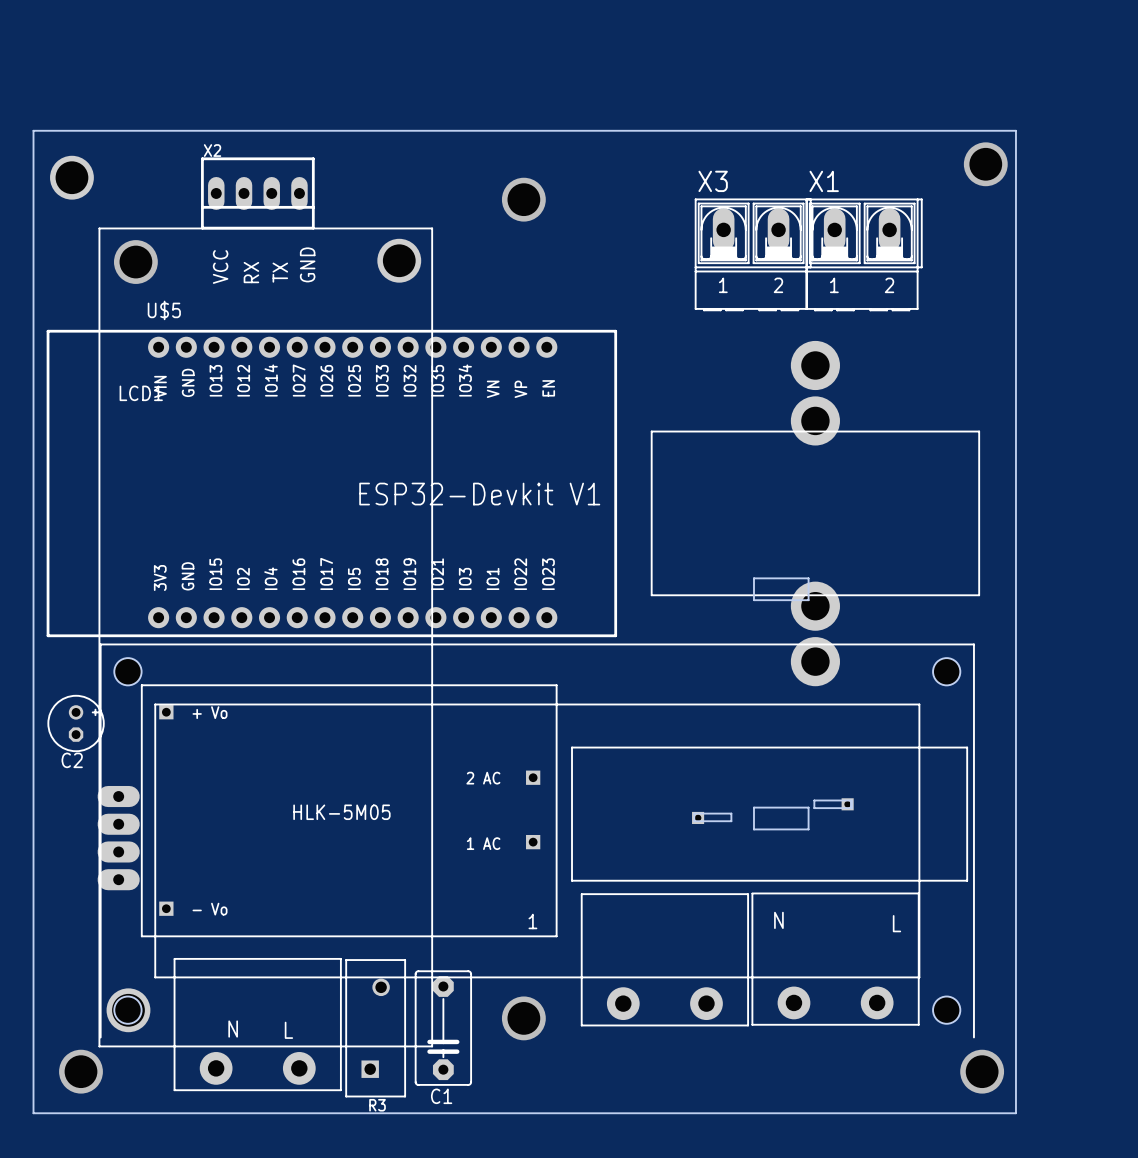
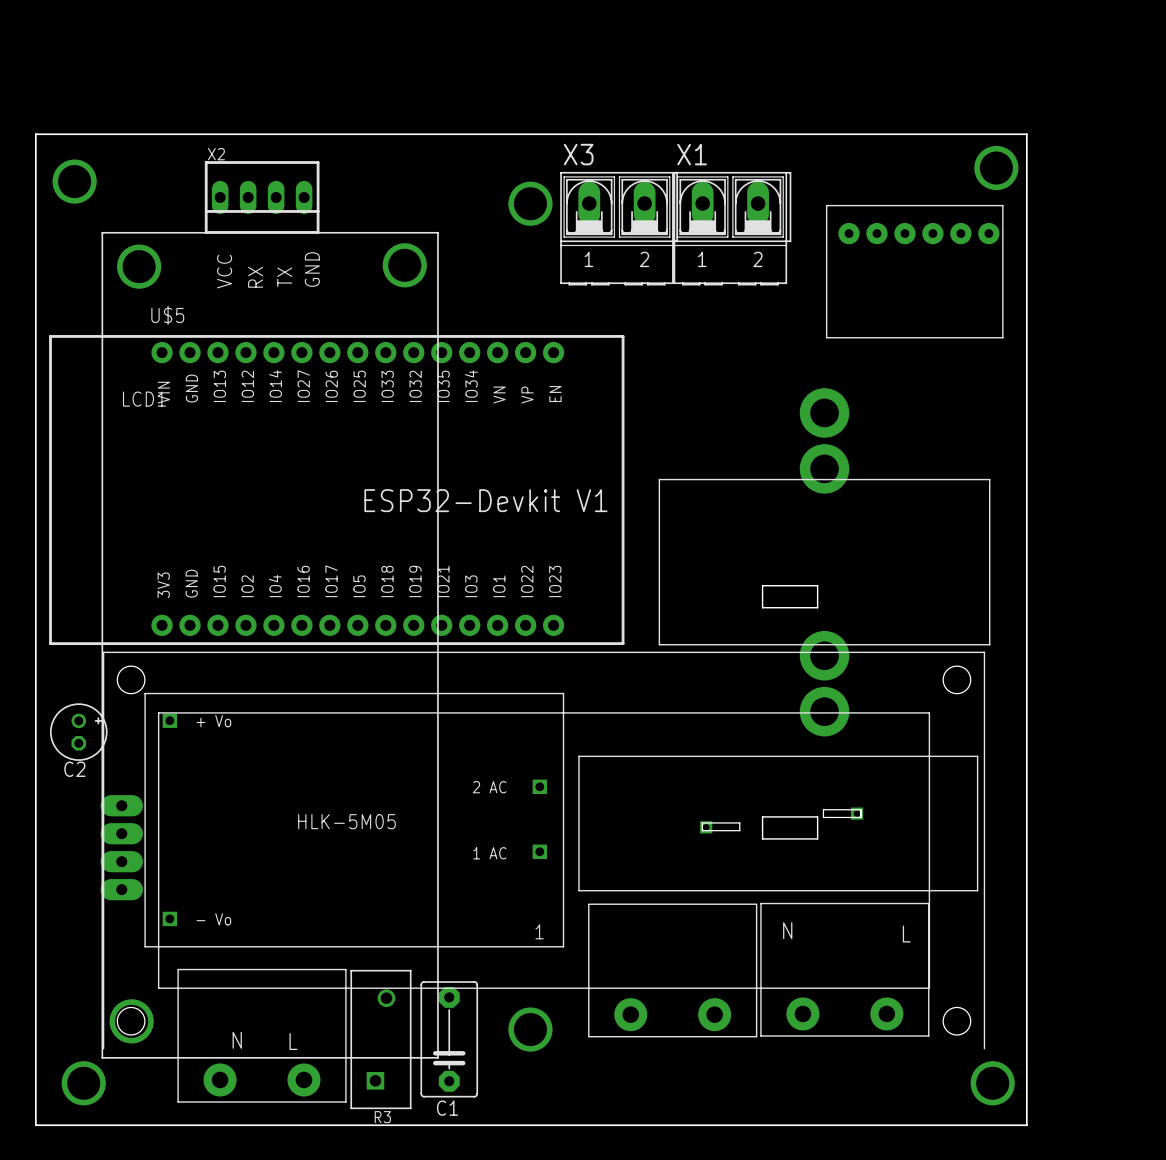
X3 position: (753, 254) -> (619, 228)
X1 position: (864, 254) -> (732, 228)
part: none -> (914, 271)
part position: (815, 513) -> (824, 562)

